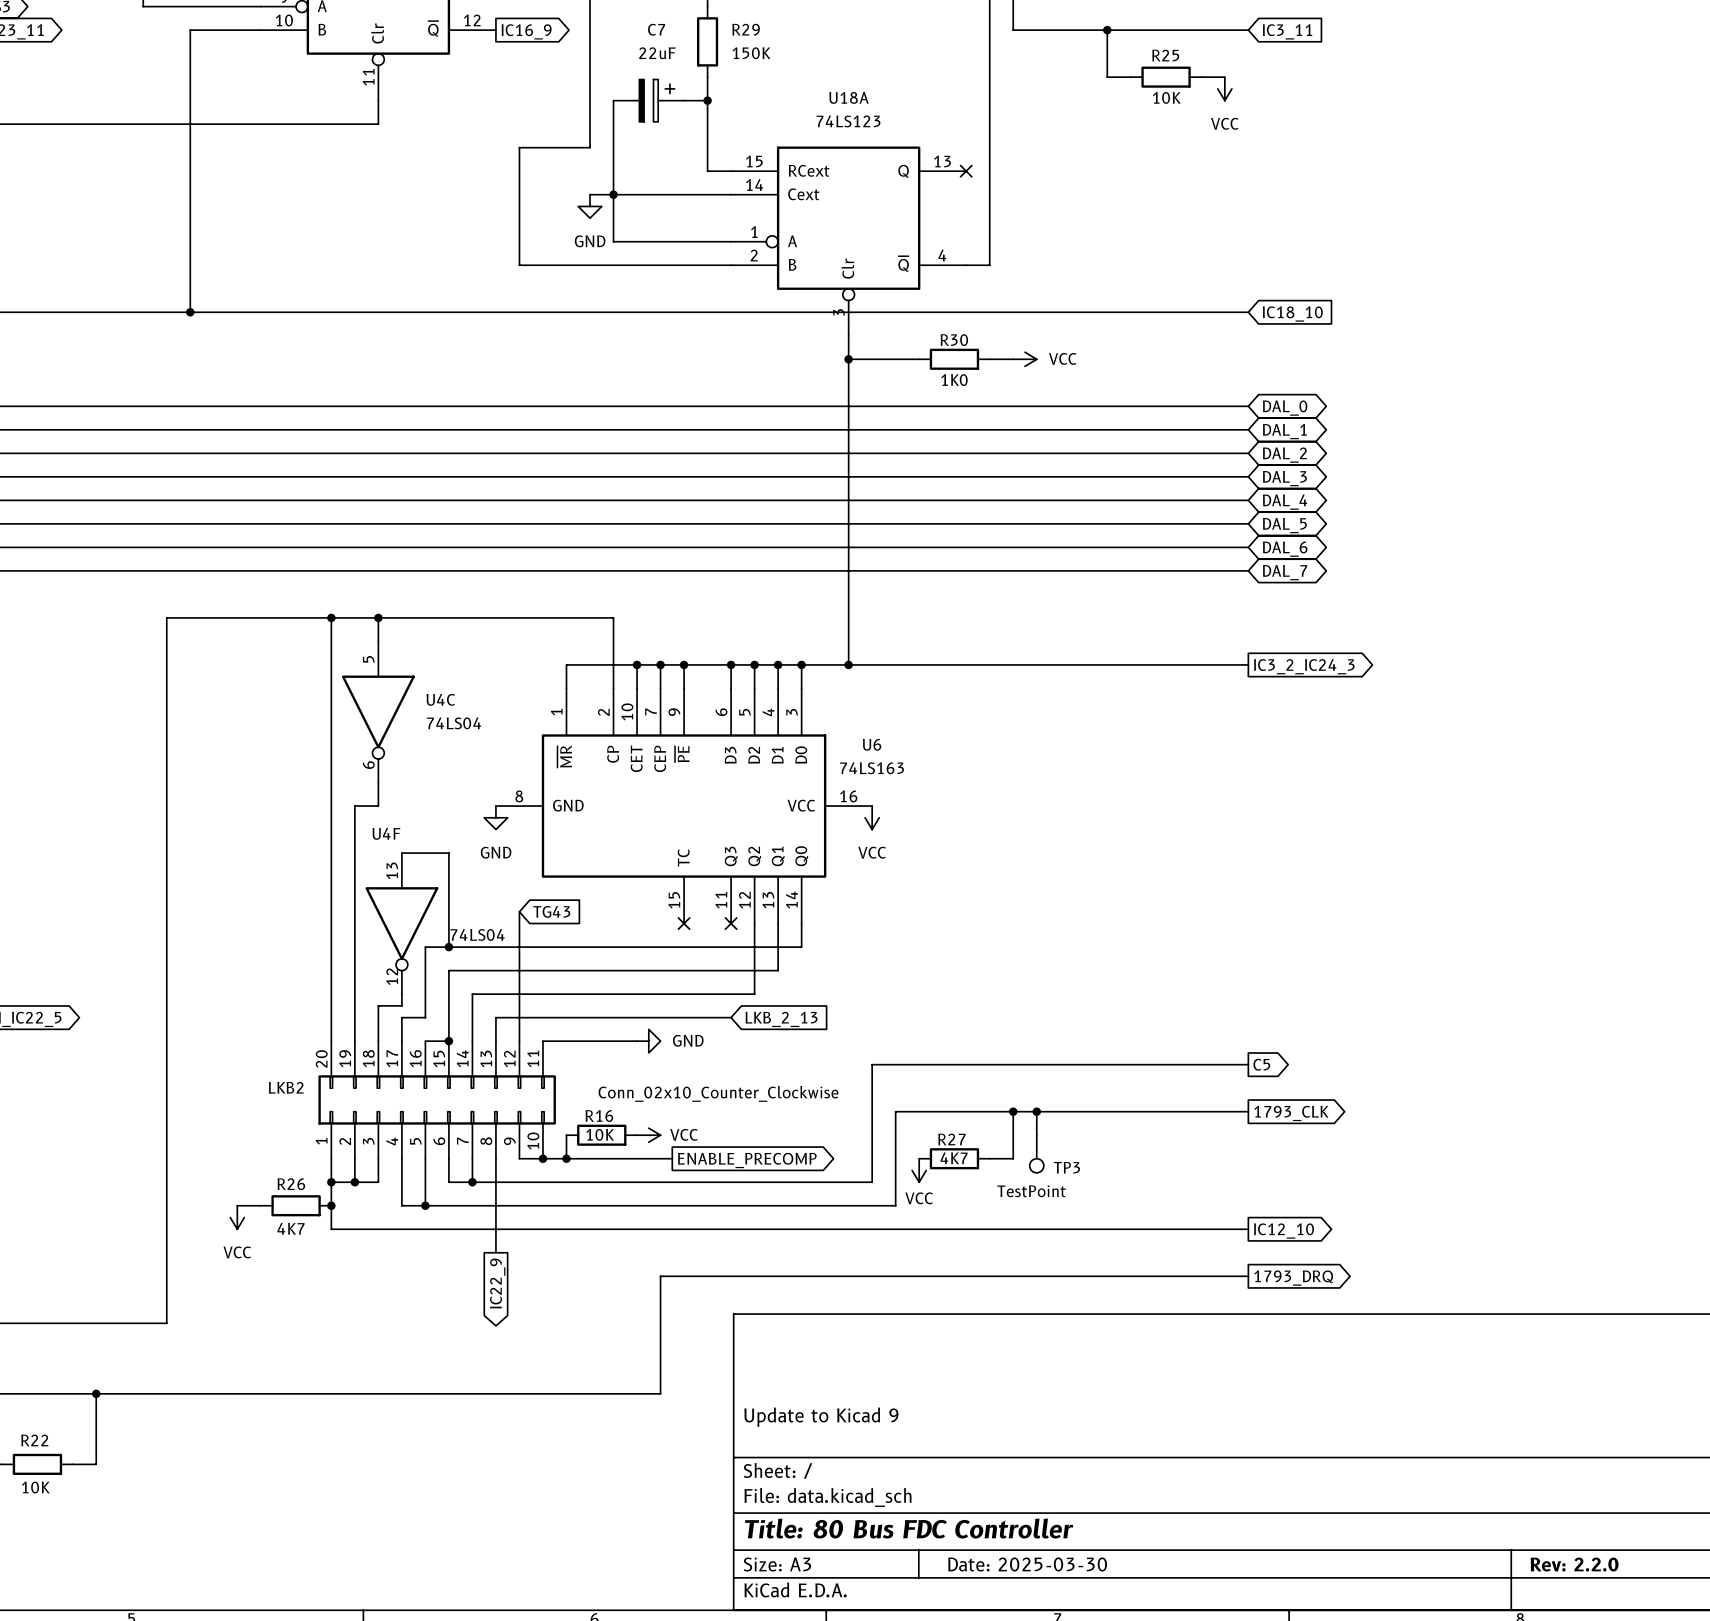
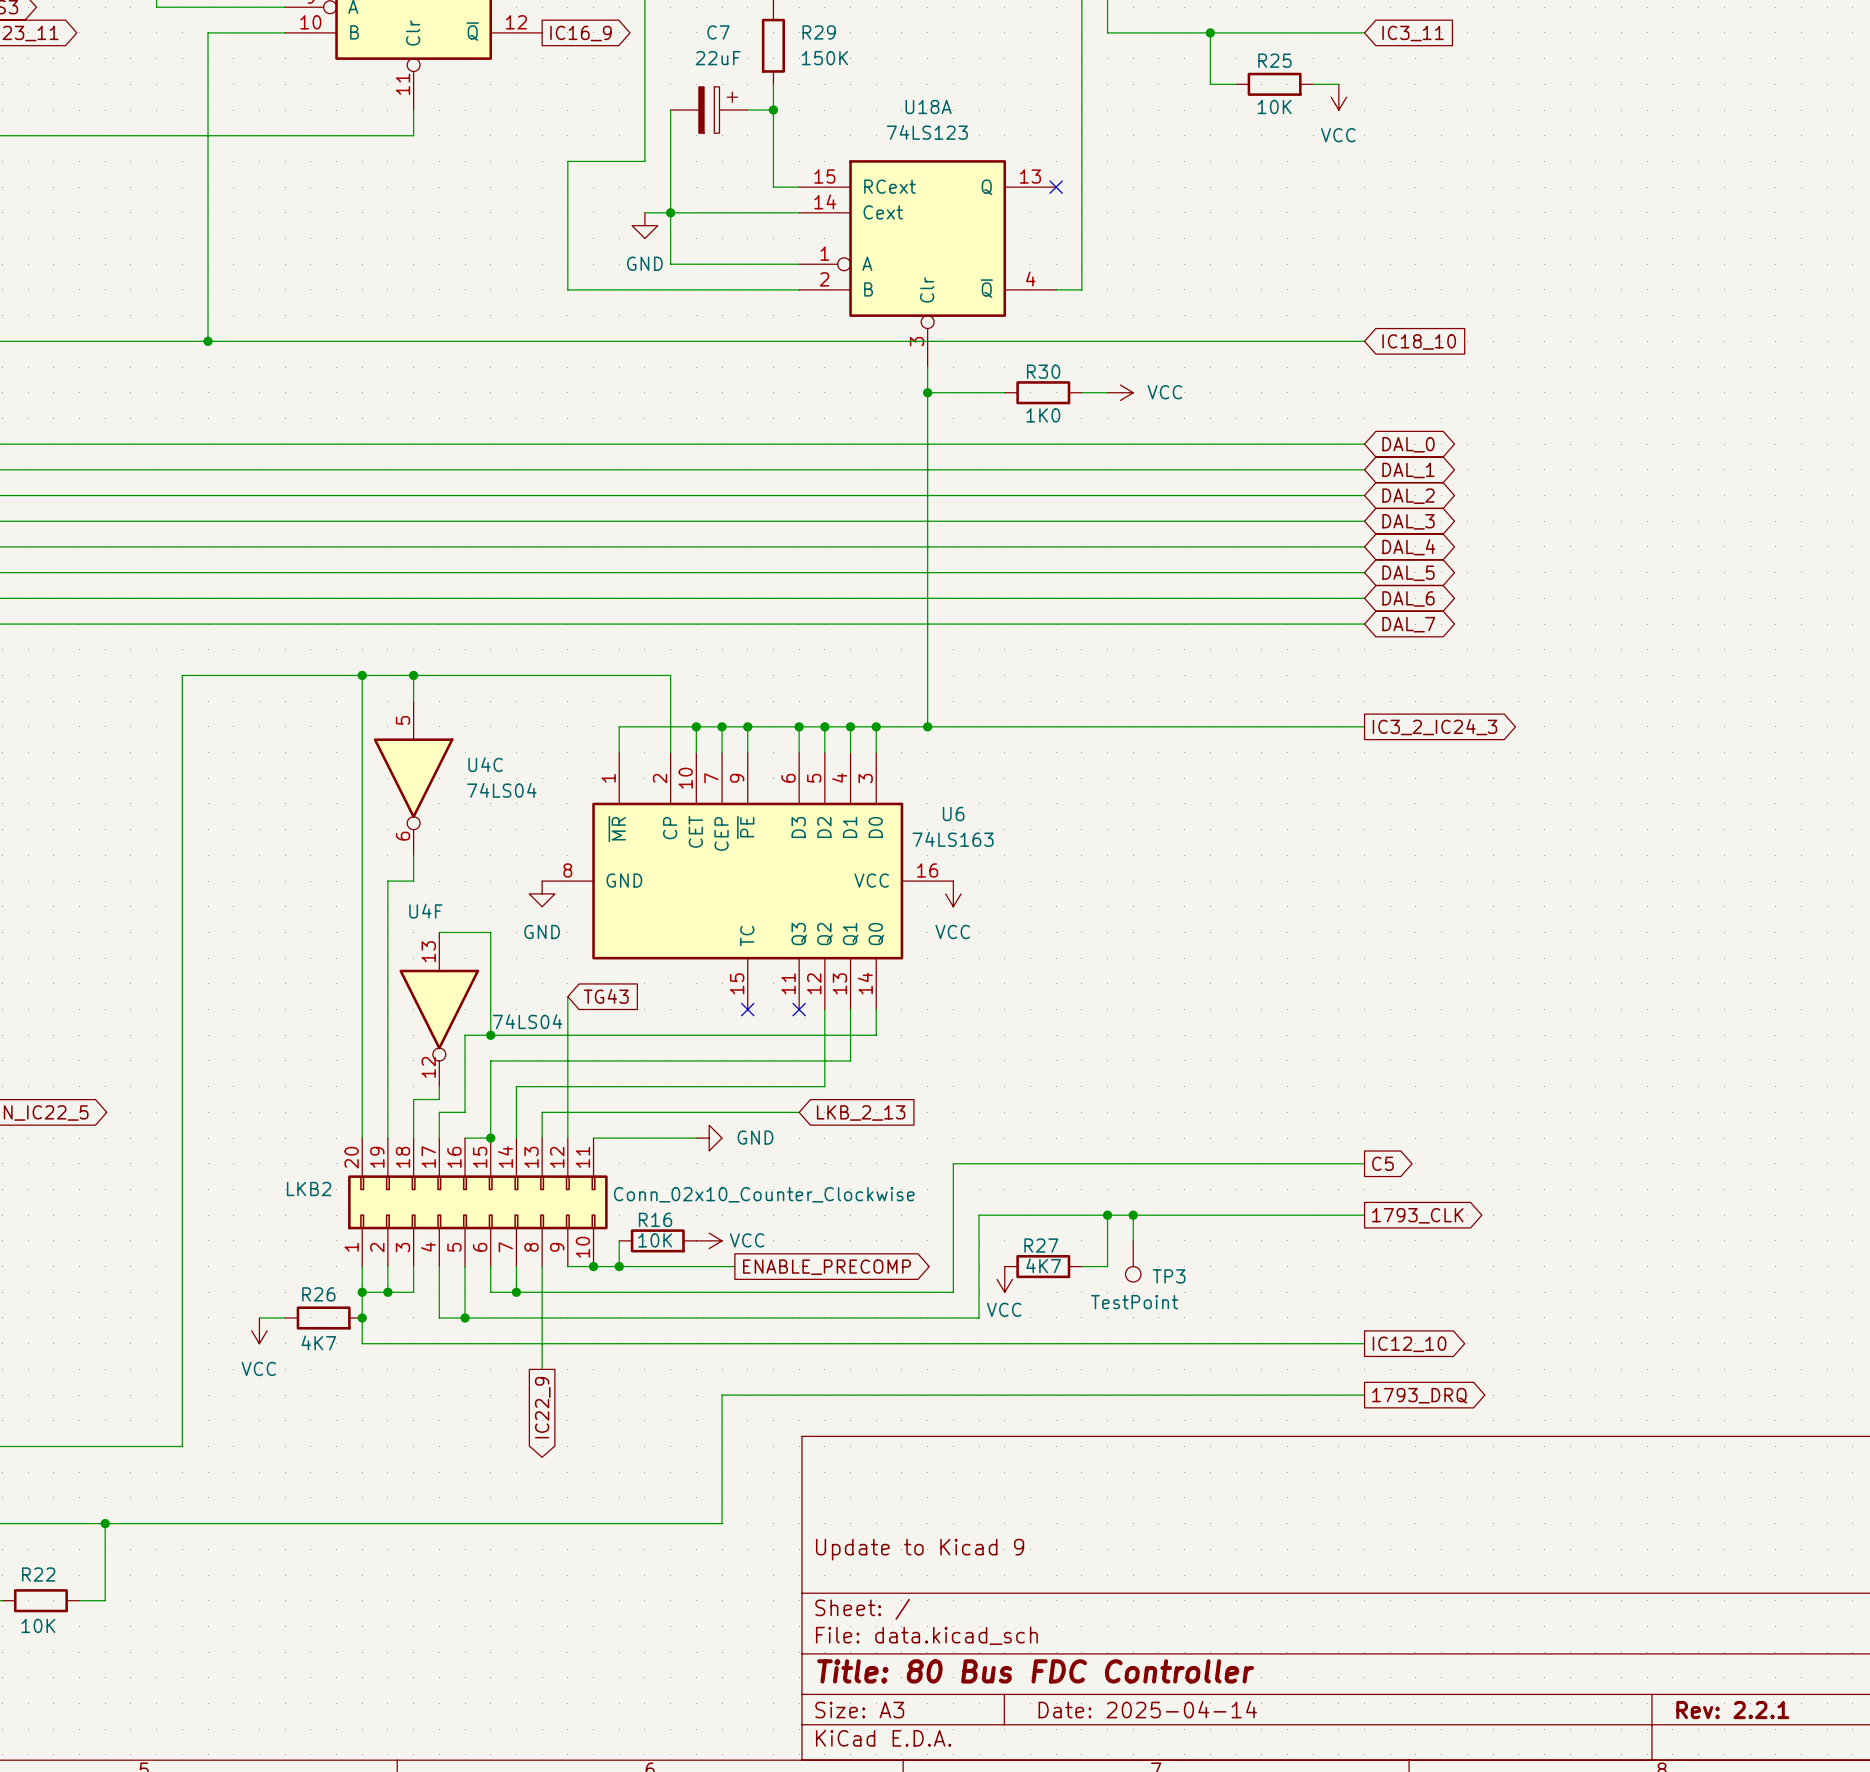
title block: Date: 2025-03-30 (1027, 1564) -> Date: 2025-04-14 (1147, 1709)
title block: Rev: 2.2.0 (1574, 1564) -> Rev: 2.2.1 (1732, 1710)

